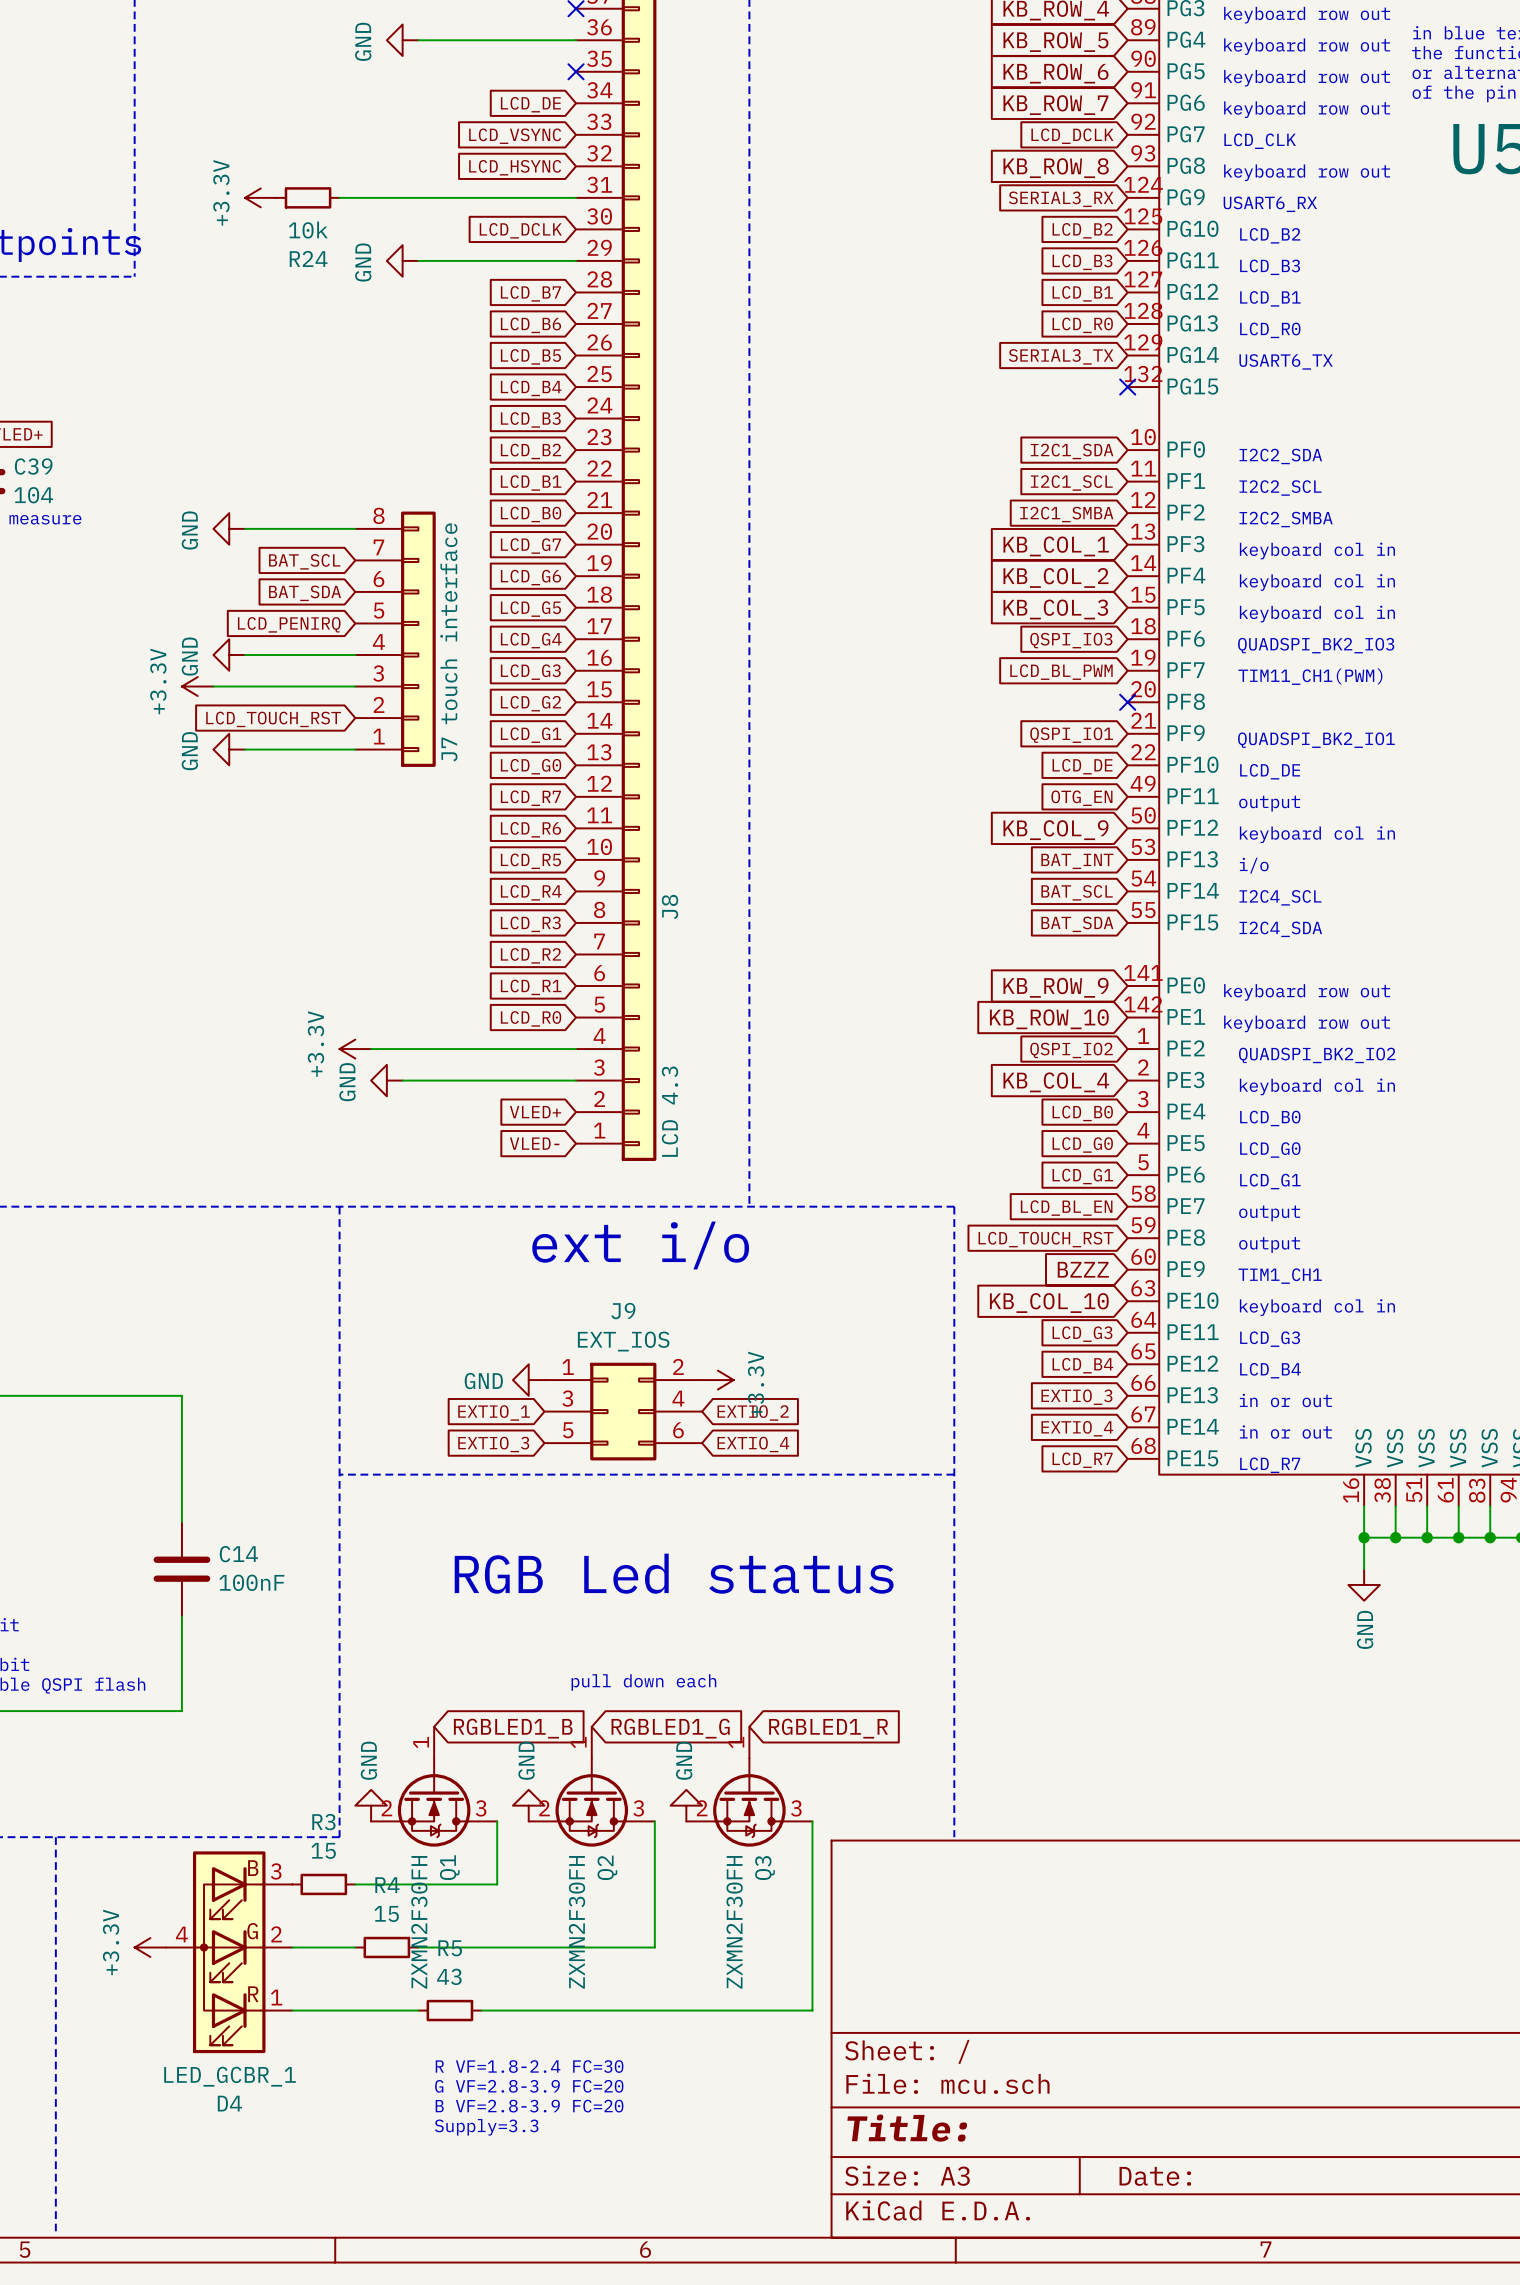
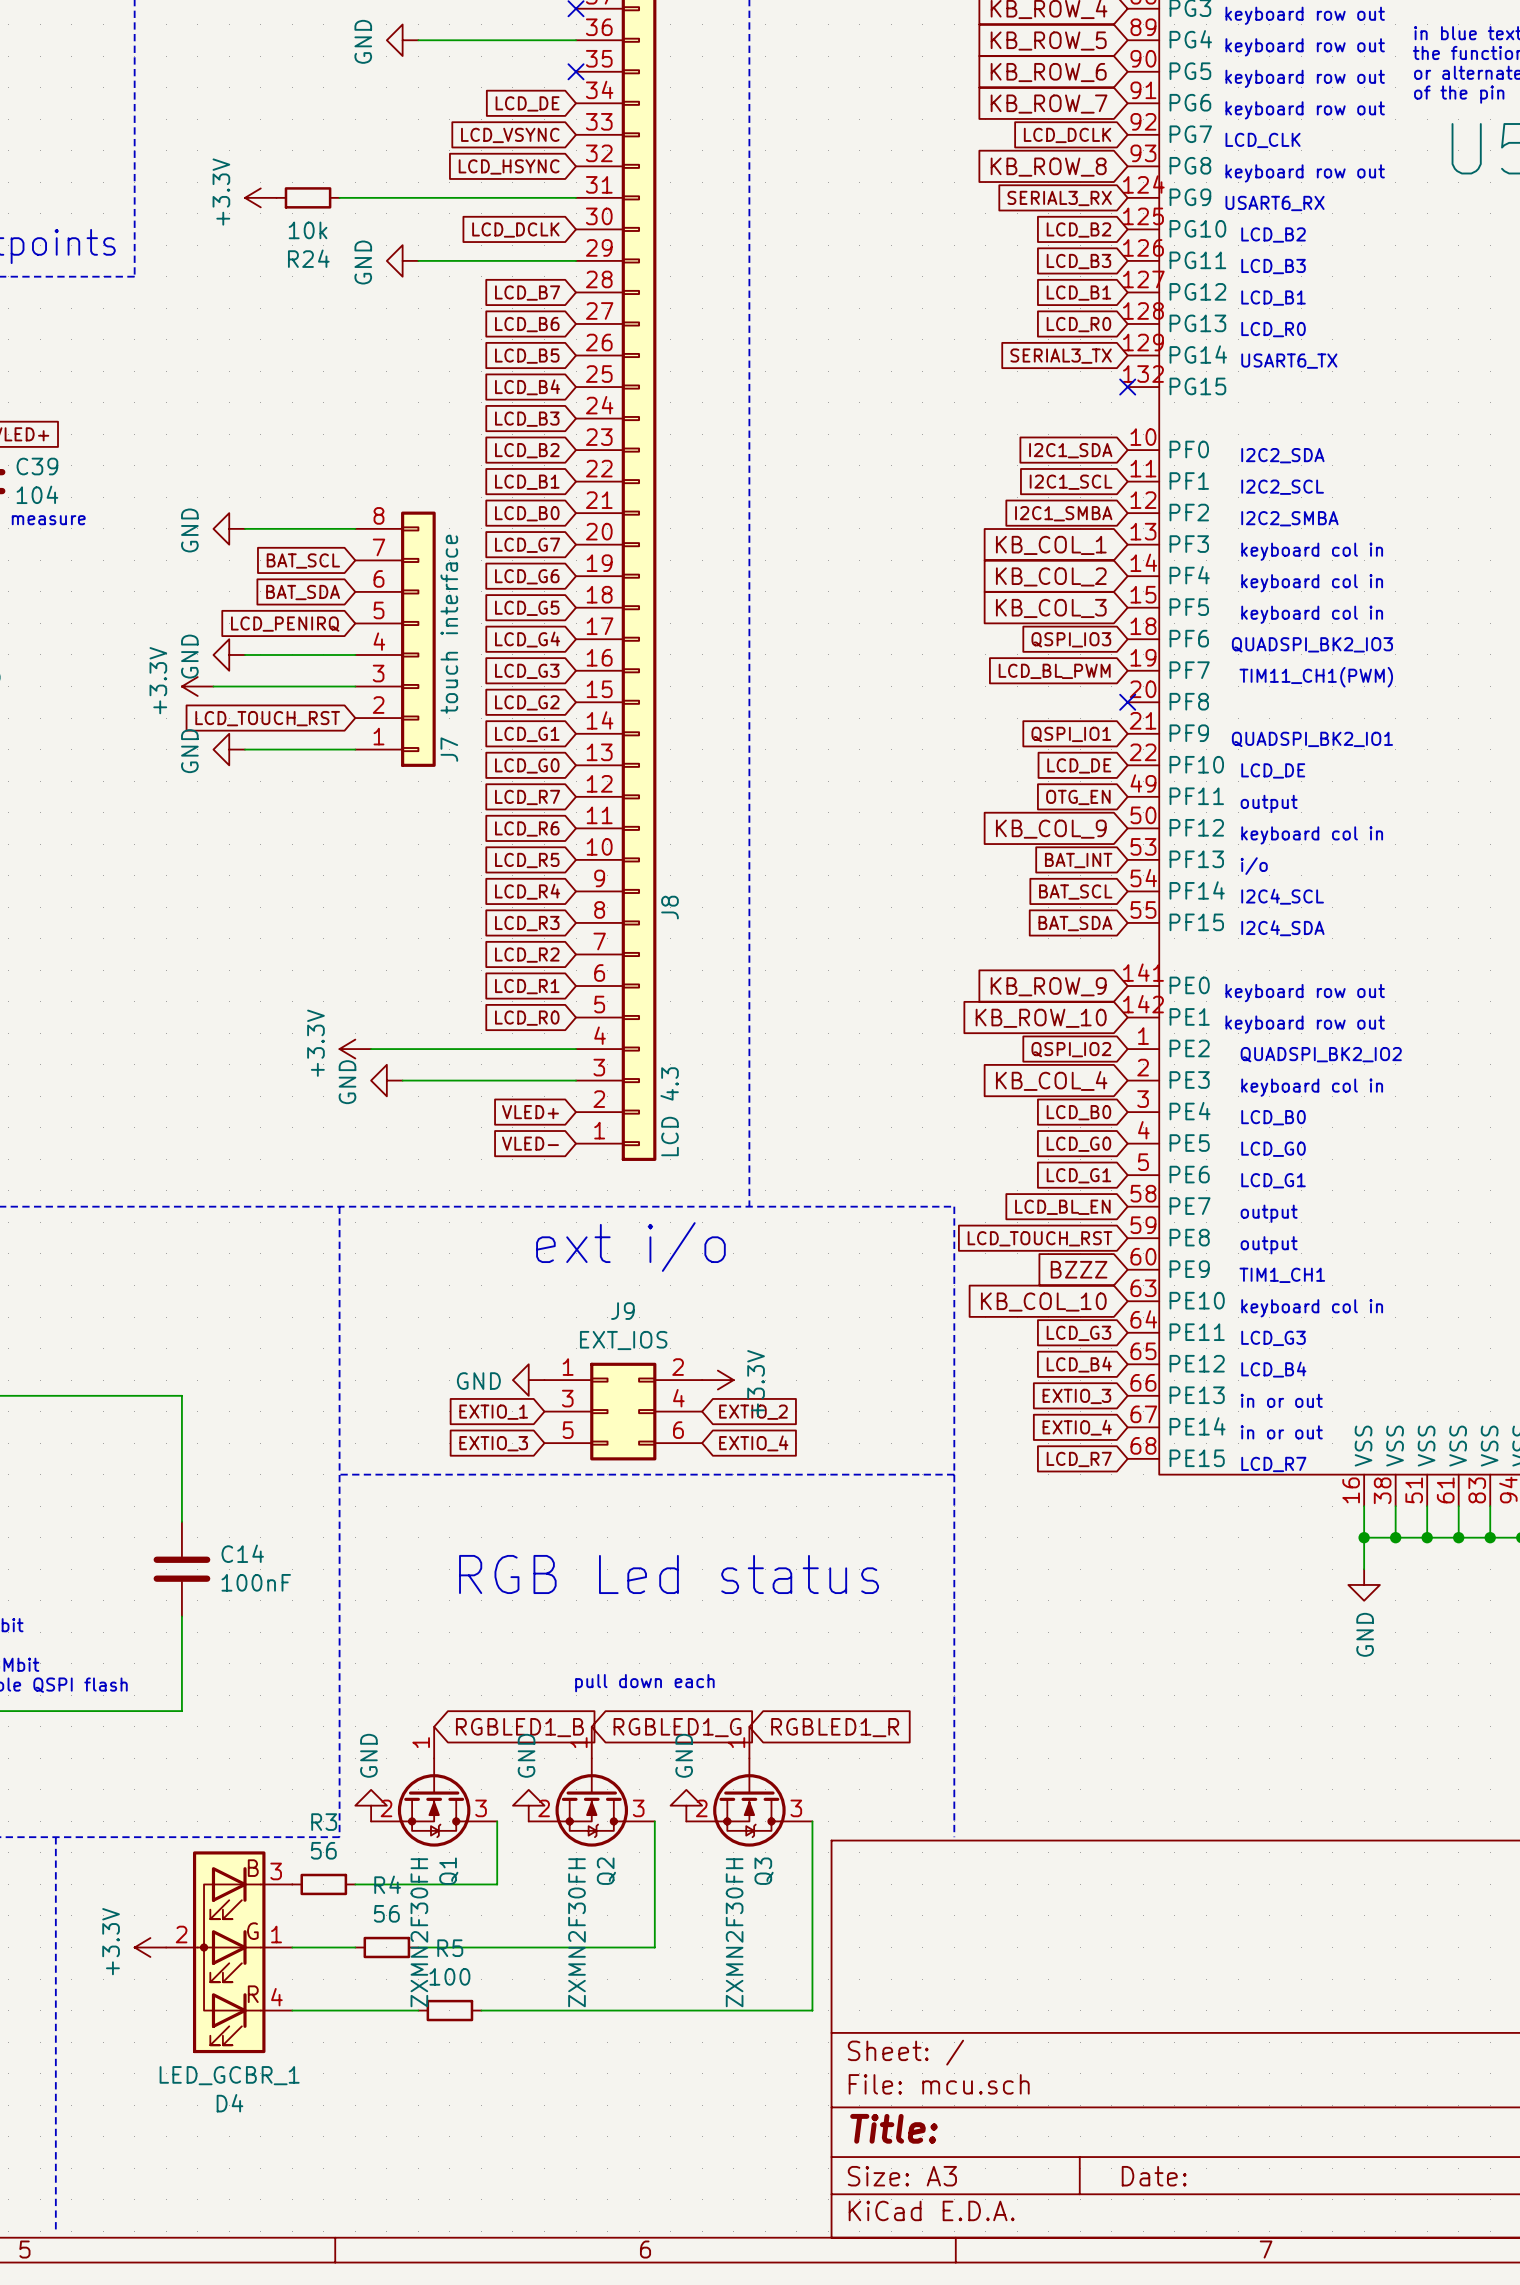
R3 value: 15 (323, 1850) -> 56 (323, 1850)
R4 value: 15 (386, 1913) -> 56 (386, 1913)
D4 pin number: 4 (181, 1934) -> 2 (181, 1934)
D4 pin number: 2 (276, 1934) -> 1 (276, 1934)
R5 value: 43 (449, 1976) -> 100 (449, 1976)
D4 pin number: 1 (276, 1997) -> 4 (276, 1997)
text: R VF=1.8-2.4 FC=30 (529, 2066) -> none
text: G VF=2.8-3.9 FC=20 (529, 2086) -> none
text: B VF=2.8-3.9 FC=20 (529, 2106) -> none
text: Supply=3.3 (486, 2127) -> none

